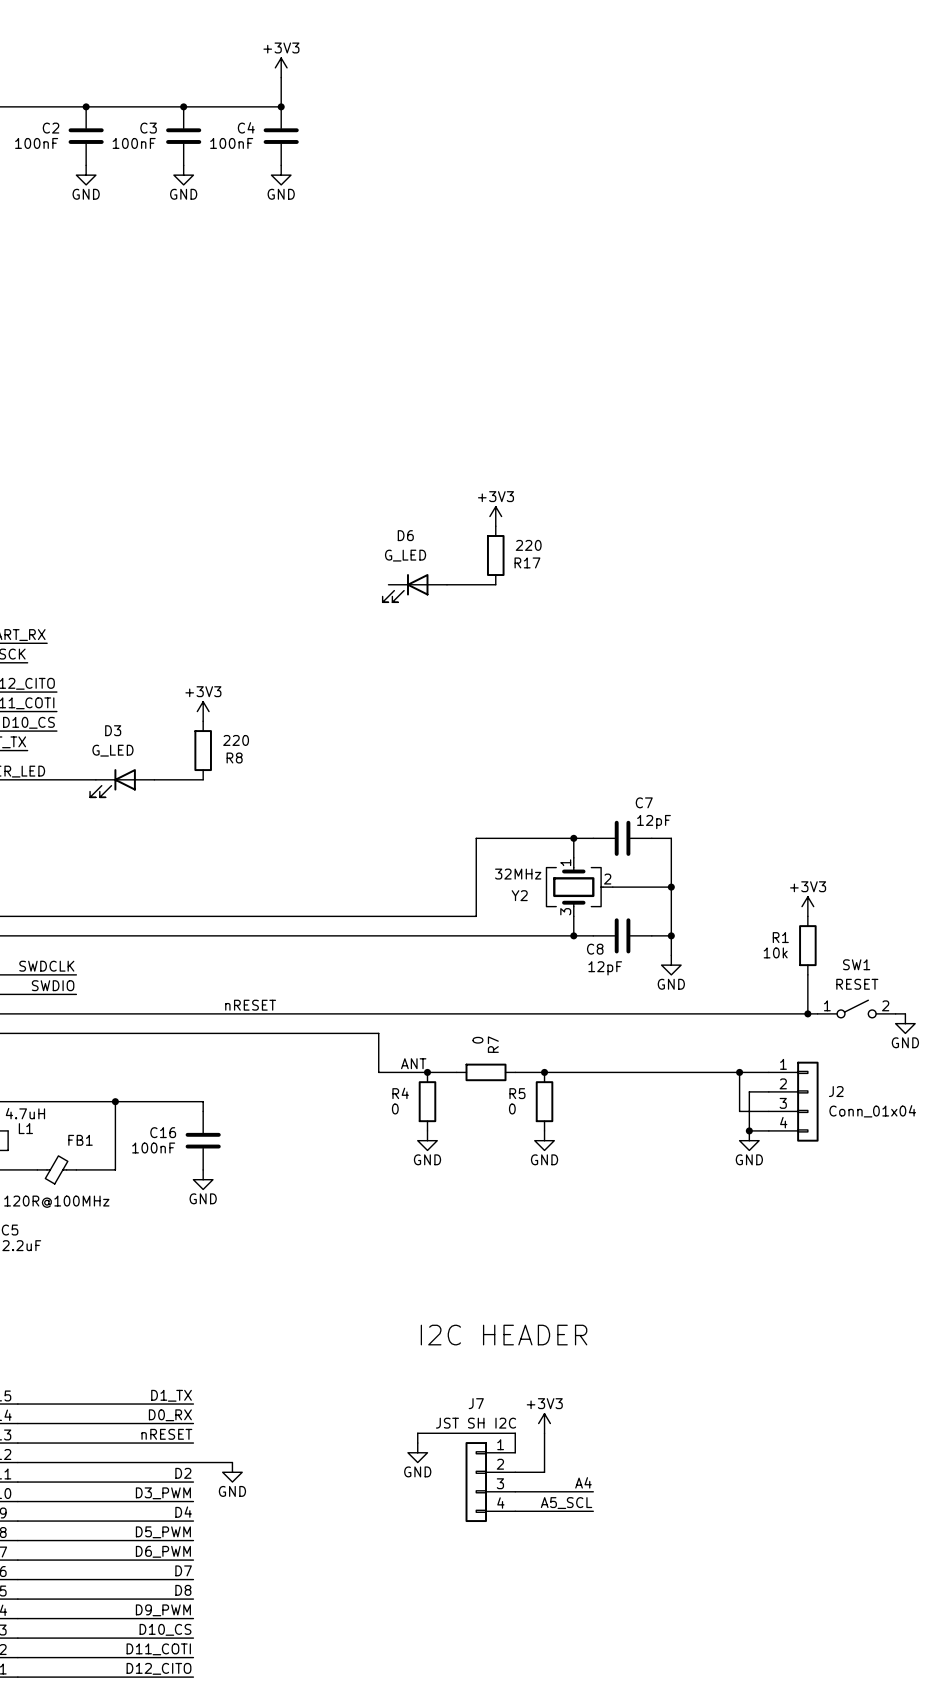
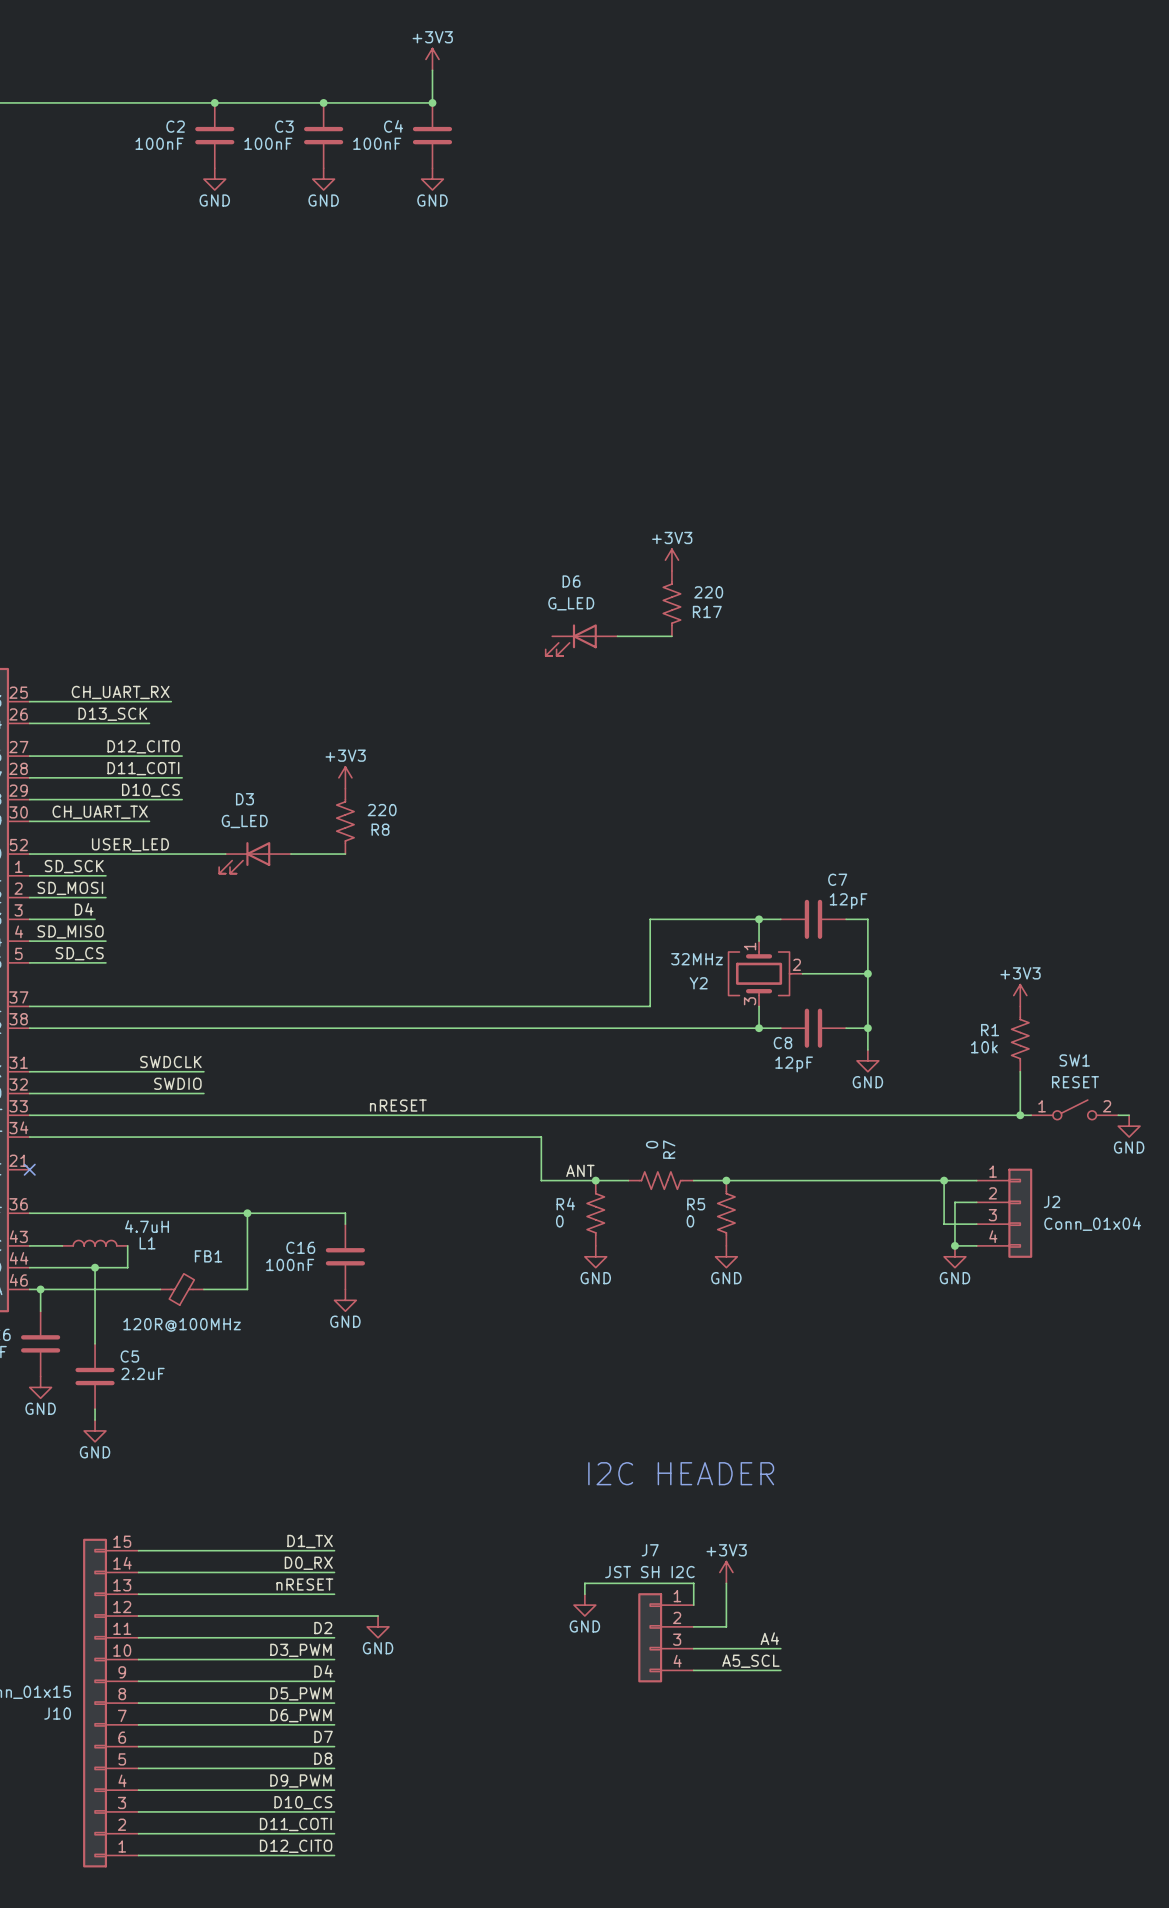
R17 symbol: [486, 526, 505, 585] -> [663, 571, 681, 637]
R8 symbol: [194, 721, 212, 780] -> [336, 788, 355, 855]
R1 symbol: [799, 916, 817, 975] -> [1011, 1006, 1029, 1072]
R7 symbol: [456, 1063, 516, 1082] -> [628, 1171, 694, 1190]
R4 symbol: [418, 1072, 437, 1131] -> [587, 1180, 605, 1246]
R5 symbol: [535, 1072, 554, 1131] -> [717, 1180, 736, 1246]

